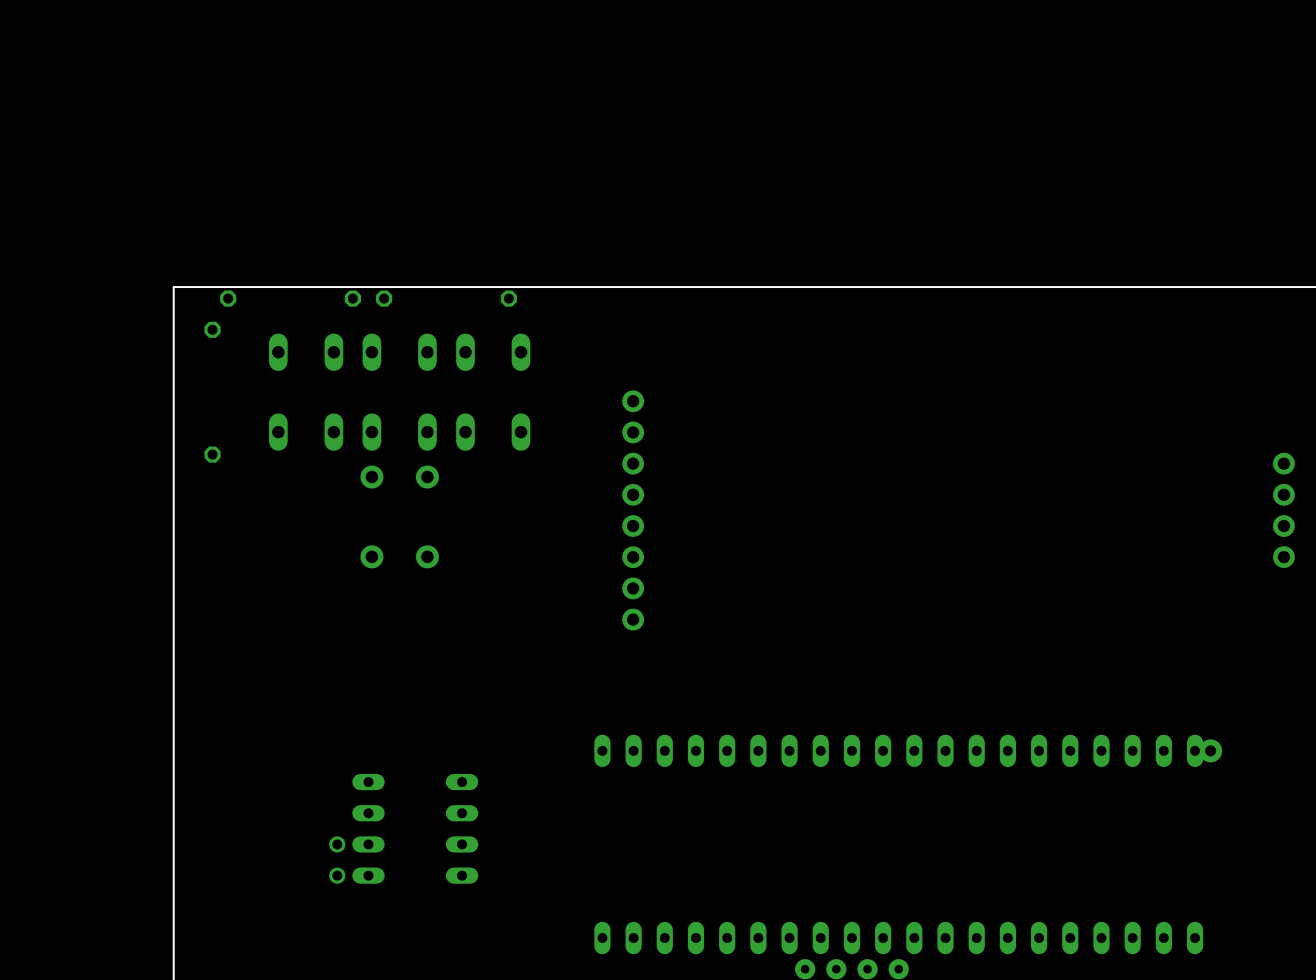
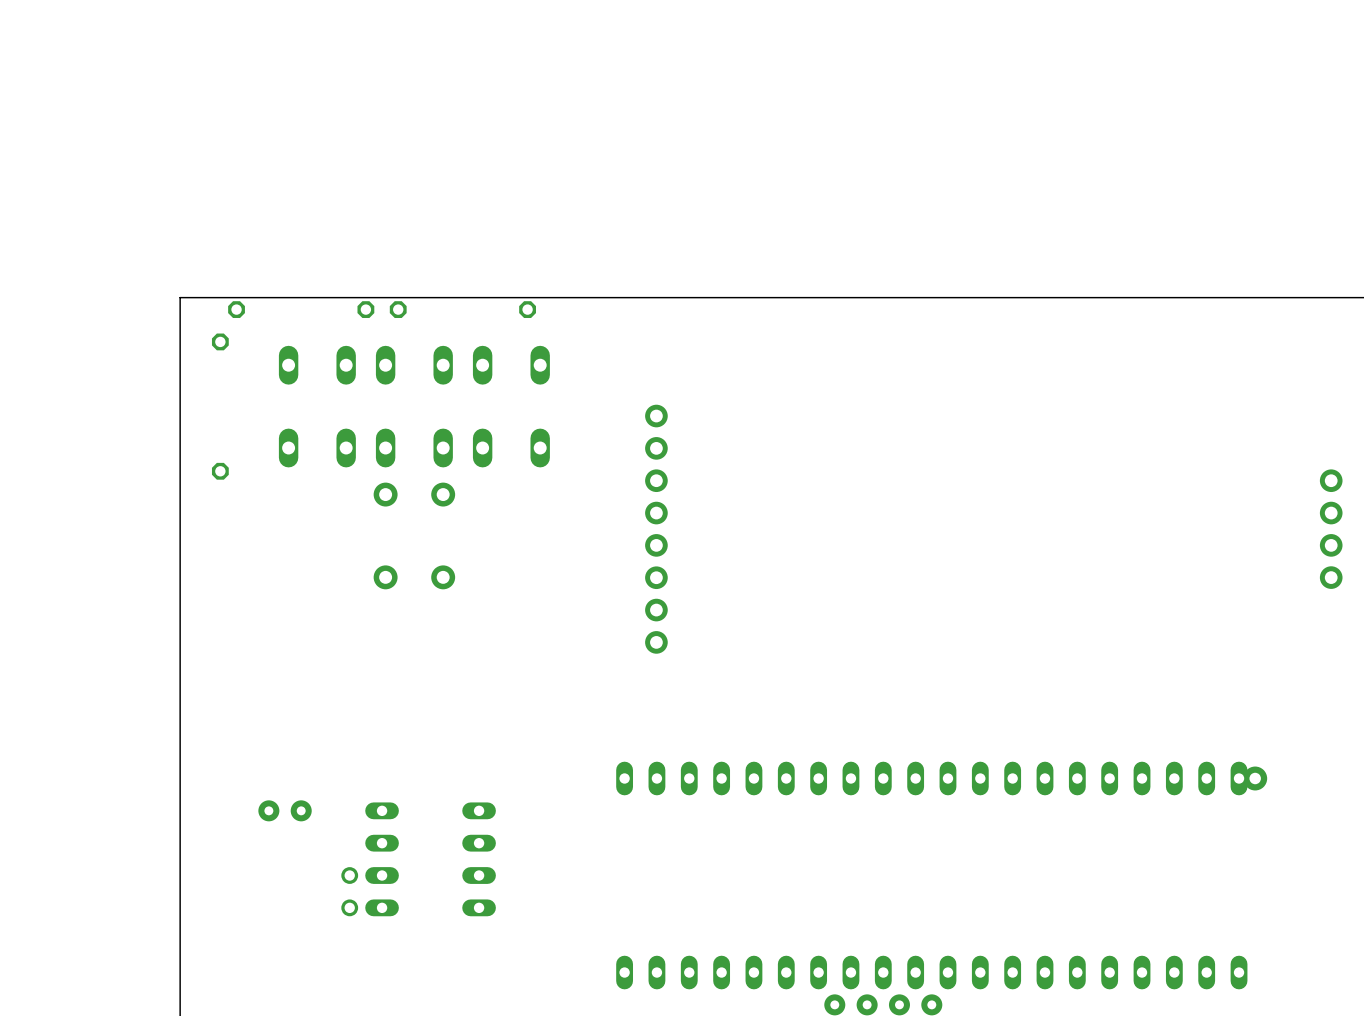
part: none -> (285, 810)

